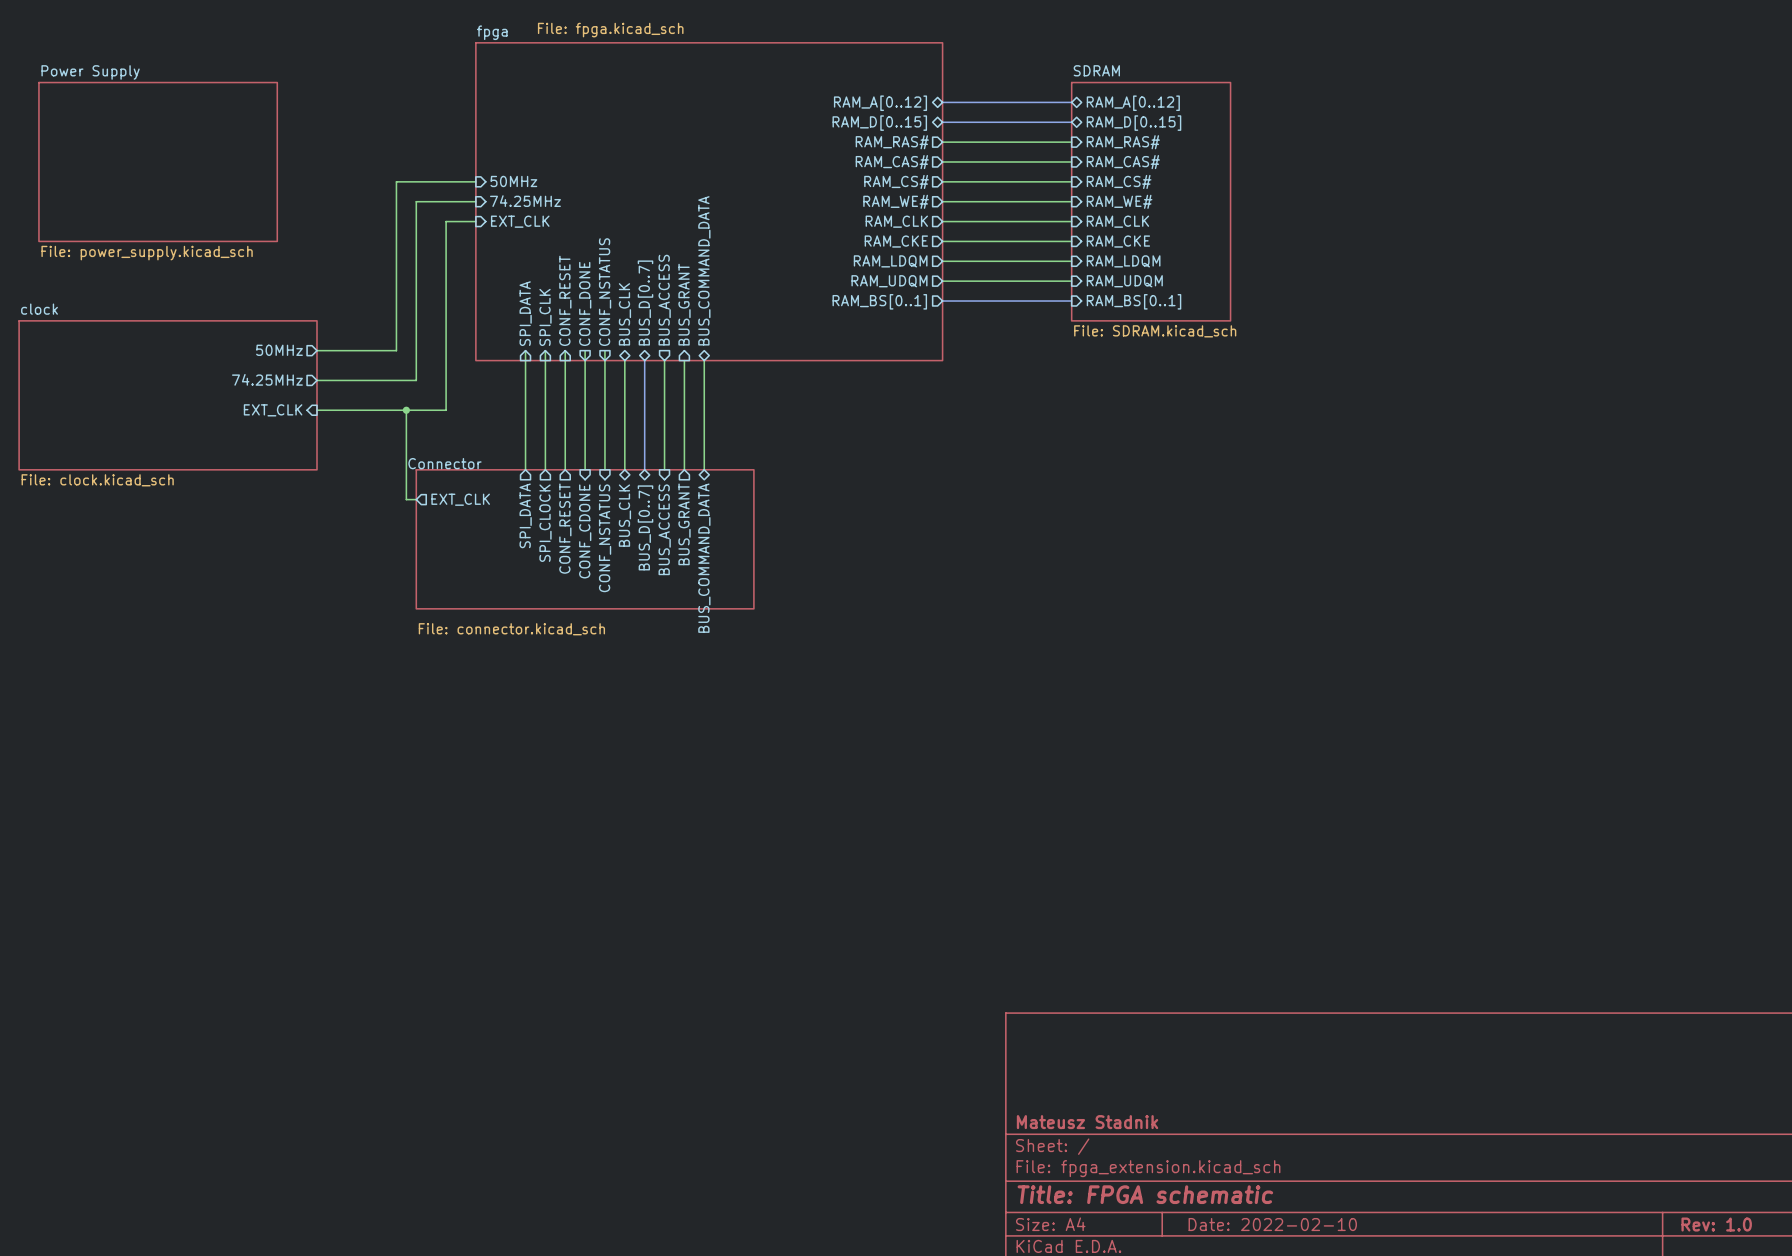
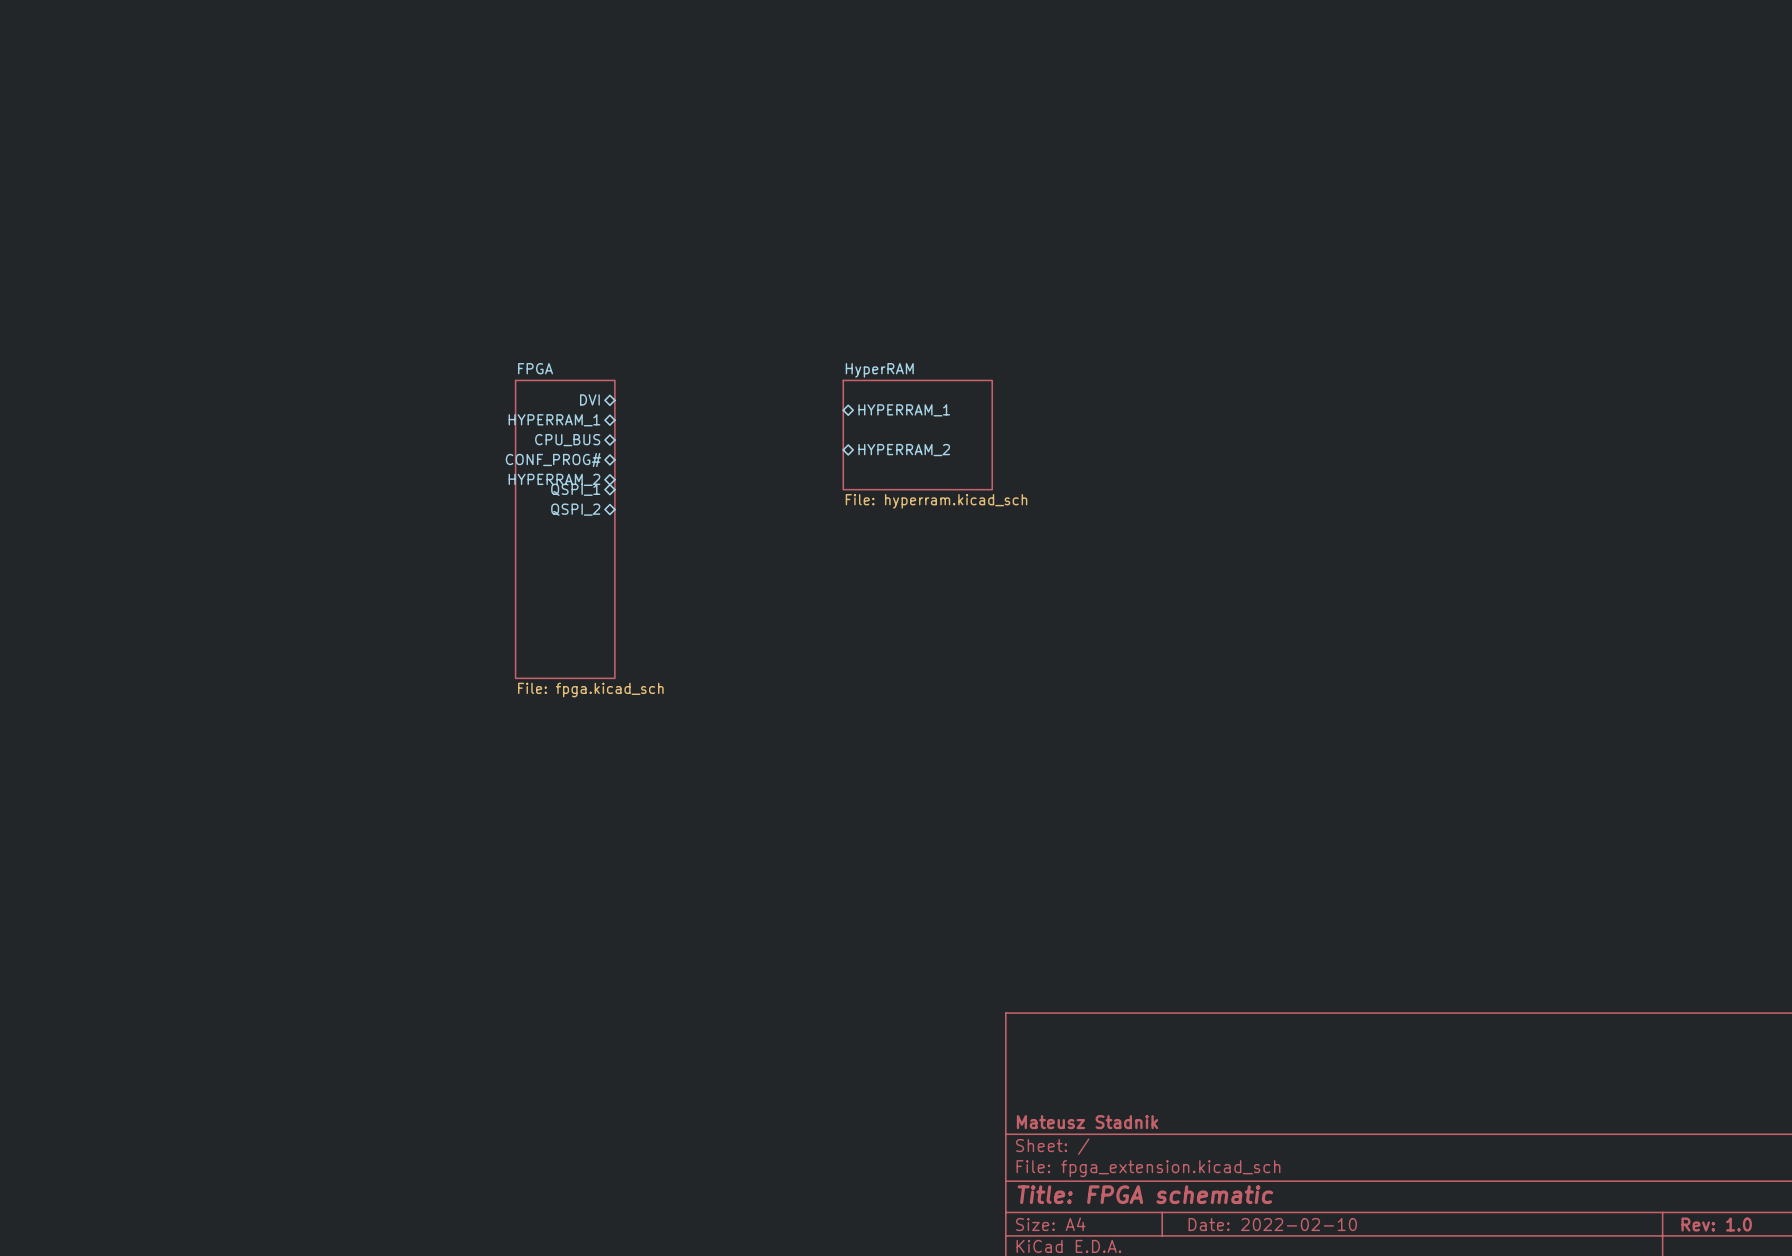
bus: (942, 102) (1071, 102) -> none
sheet pin: RAM_A[0..12] (880, 103) -> none
sheet pin: RAM_A[0..12] (1133, 103) -> none
bus: (942, 122) (1071, 122) -> none
sheet pin: RAM_D[0..15] (879, 123) -> none
sheet pin: RAM_D[0..15] (1134, 123) -> none
sheet pin: RAM_RAS# (892, 142) -> none
wire: (942, 142) (1071, 142) -> none
sheet pin: RAM_RAS# (1123, 142) -> none
sheet Power Supply: File: power_supply.kicad_sch (158, 161) -> none
wire: (942, 161) (1071, 161) -> none
sheet pin: RAM_CAS# (892, 162) -> none
sheet pin: RAM_CAS# (1123, 162) -> none
wire: (475, 181) (396, 181) (396, 350) (317, 350) -> none
sheet pin: 50MHz (513, 181) -> none
sheet pin: RAM_CS# (896, 181) -> none
wire: (942, 181) (1071, 181) -> none
sheet pin: RAM_CS# (1119, 181) -> none
wire: (475, 201) (416, 201) (416, 380) (317, 380) -> none
sheet pin: 74.25MHz (525, 201) -> none
sheet fpga: File: fpga.kicad_sch (709, 201) -> none
sheet pin: RAM_WE# (896, 201) -> none
wire: (942, 201) (1071, 201) -> none
sheet pin: RAM_WE# (1119, 201) -> none
sheet SDRAM: File: SDRAM.kicad_sch (1151, 201) -> none
wire: (475, 221) (446, 221) (446, 410) (317, 410) -> none
sheet pin: EXT_CLK (520, 221) -> none
sheet pin: RAM_CLK (896, 221) -> none
wire: (942, 221) (1071, 221) -> none
sheet pin: RAM_CLK (1117, 221) -> none
sheet pin: RAM_CKE (896, 241) -> none
wire: (942, 241) (1071, 241) -> none
sheet pin: RAM_CKE (1118, 241) -> none
sheet pin: RAM_LDQM (890, 261) -> none
wire: (942, 261) (1071, 261) -> none
sheet pin: RAM_LDQM (1123, 261) -> none
sheet pin: BUS_COMMAND_DATA (704, 270) -> none
sheet pin: RAM_UDQM (889, 281) -> none
wire: (942, 281) (1071, 281) -> none
sheet pin: RAM_UDQM (1124, 281) -> none
sheet pin: CONF_NSTATUS (605, 292) -> none
sheet pin: CONF_RESET (565, 300) -> none
sheet pin: BUS_ACCESS (664, 300) -> none
sheet pin: RAM_BS[0..1] (879, 301) -> none
bus: (942, 301) (1071, 301) -> none
sheet pin: RAM_BS[0..1] (1134, 301) -> none
sheet pin: BUS_D[0..7] (645, 302) -> none
sheet pin: CONF_DONE (585, 303) -> none
sheet pin: BUS_GRANT (684, 304) -> none
sheet pin: SPI_DATA (525, 313) -> none
sheet pin: BUS_CLK (624, 314) -> none
sheet pin: SPI_CLK (545, 317) -> none
sheet pin: 50MHz (279, 350) -> none
wire: (525, 350) (525, 469) -> none
wire: (545, 350) (545, 469) -> none
wire: (565, 350) (565, 469) -> none
wire: (585, 350) (585, 469) -> none
wire: (604, 350) (604, 469) -> none
wire: (624, 360) (624, 469) -> none
bus: (644, 360) (644, 469) -> none
wire: (664, 360) (664, 469) -> none
wire: (684, 360) (684, 469) -> none
wire: (704, 360) (704, 469) -> none
sheet pin: 74.25MHz (267, 379) -> none
sheet clock: File: clock.kicad_sch (168, 395) -> none
sheet pin: none -> DVI (589, 399)
sheet pin: EXT_CLK (273, 410) -> none
wire: (406, 410) (406, 499) (416, 499) -> none
junction: (406, 410) -> none
sheet pin: none -> HYPERRAM_1 (904, 410)
sheet pin: none -> HYPERRAM_1 (554, 420)
sheet HyperRAM: none -> File: hyperram.kicad_sch (917, 435)
sheet pin: none -> CPU_BUS (567, 440)
sheet pin: none -> HYPERRAM_2 (904, 450)
sheet pin: none -> CONF_PROG# (553, 459)
sheet pin: none -> HYPERRAM_2 (554, 479)
sheet pin: none -> QSPI_1 (575, 489)
sheet pin: EXT_CLK (460, 499) -> none
sheet pin: none -> QSPI_2 (575, 509)
sheet pin: SPI_DATA (525, 515) -> none
sheet pin: BUS_CLK (624, 515) -> none
sheet pin: SPI_CLOCK (545, 523) -> none
sheet pin: BUS_GRANT (684, 524) -> none
sheet pin: BUS_D[0..7] (645, 527) -> none
sheet pin: CONF_RESET (565, 528) -> none
sheet FPGA: none -> File: fpga.kicad_sch (565, 529)
sheet pin: BUS_ACCESS (664, 529) -> none
sheet pin: CONF_CDONE (585, 531) -> none
sheet pin: CONF_NSTATUS (605, 538) -> none
sheet Connector: File: connector.kicad_sch (585, 539) -> none
sheet pin: BUS_COMMAND_DATA (704, 558) -> none

